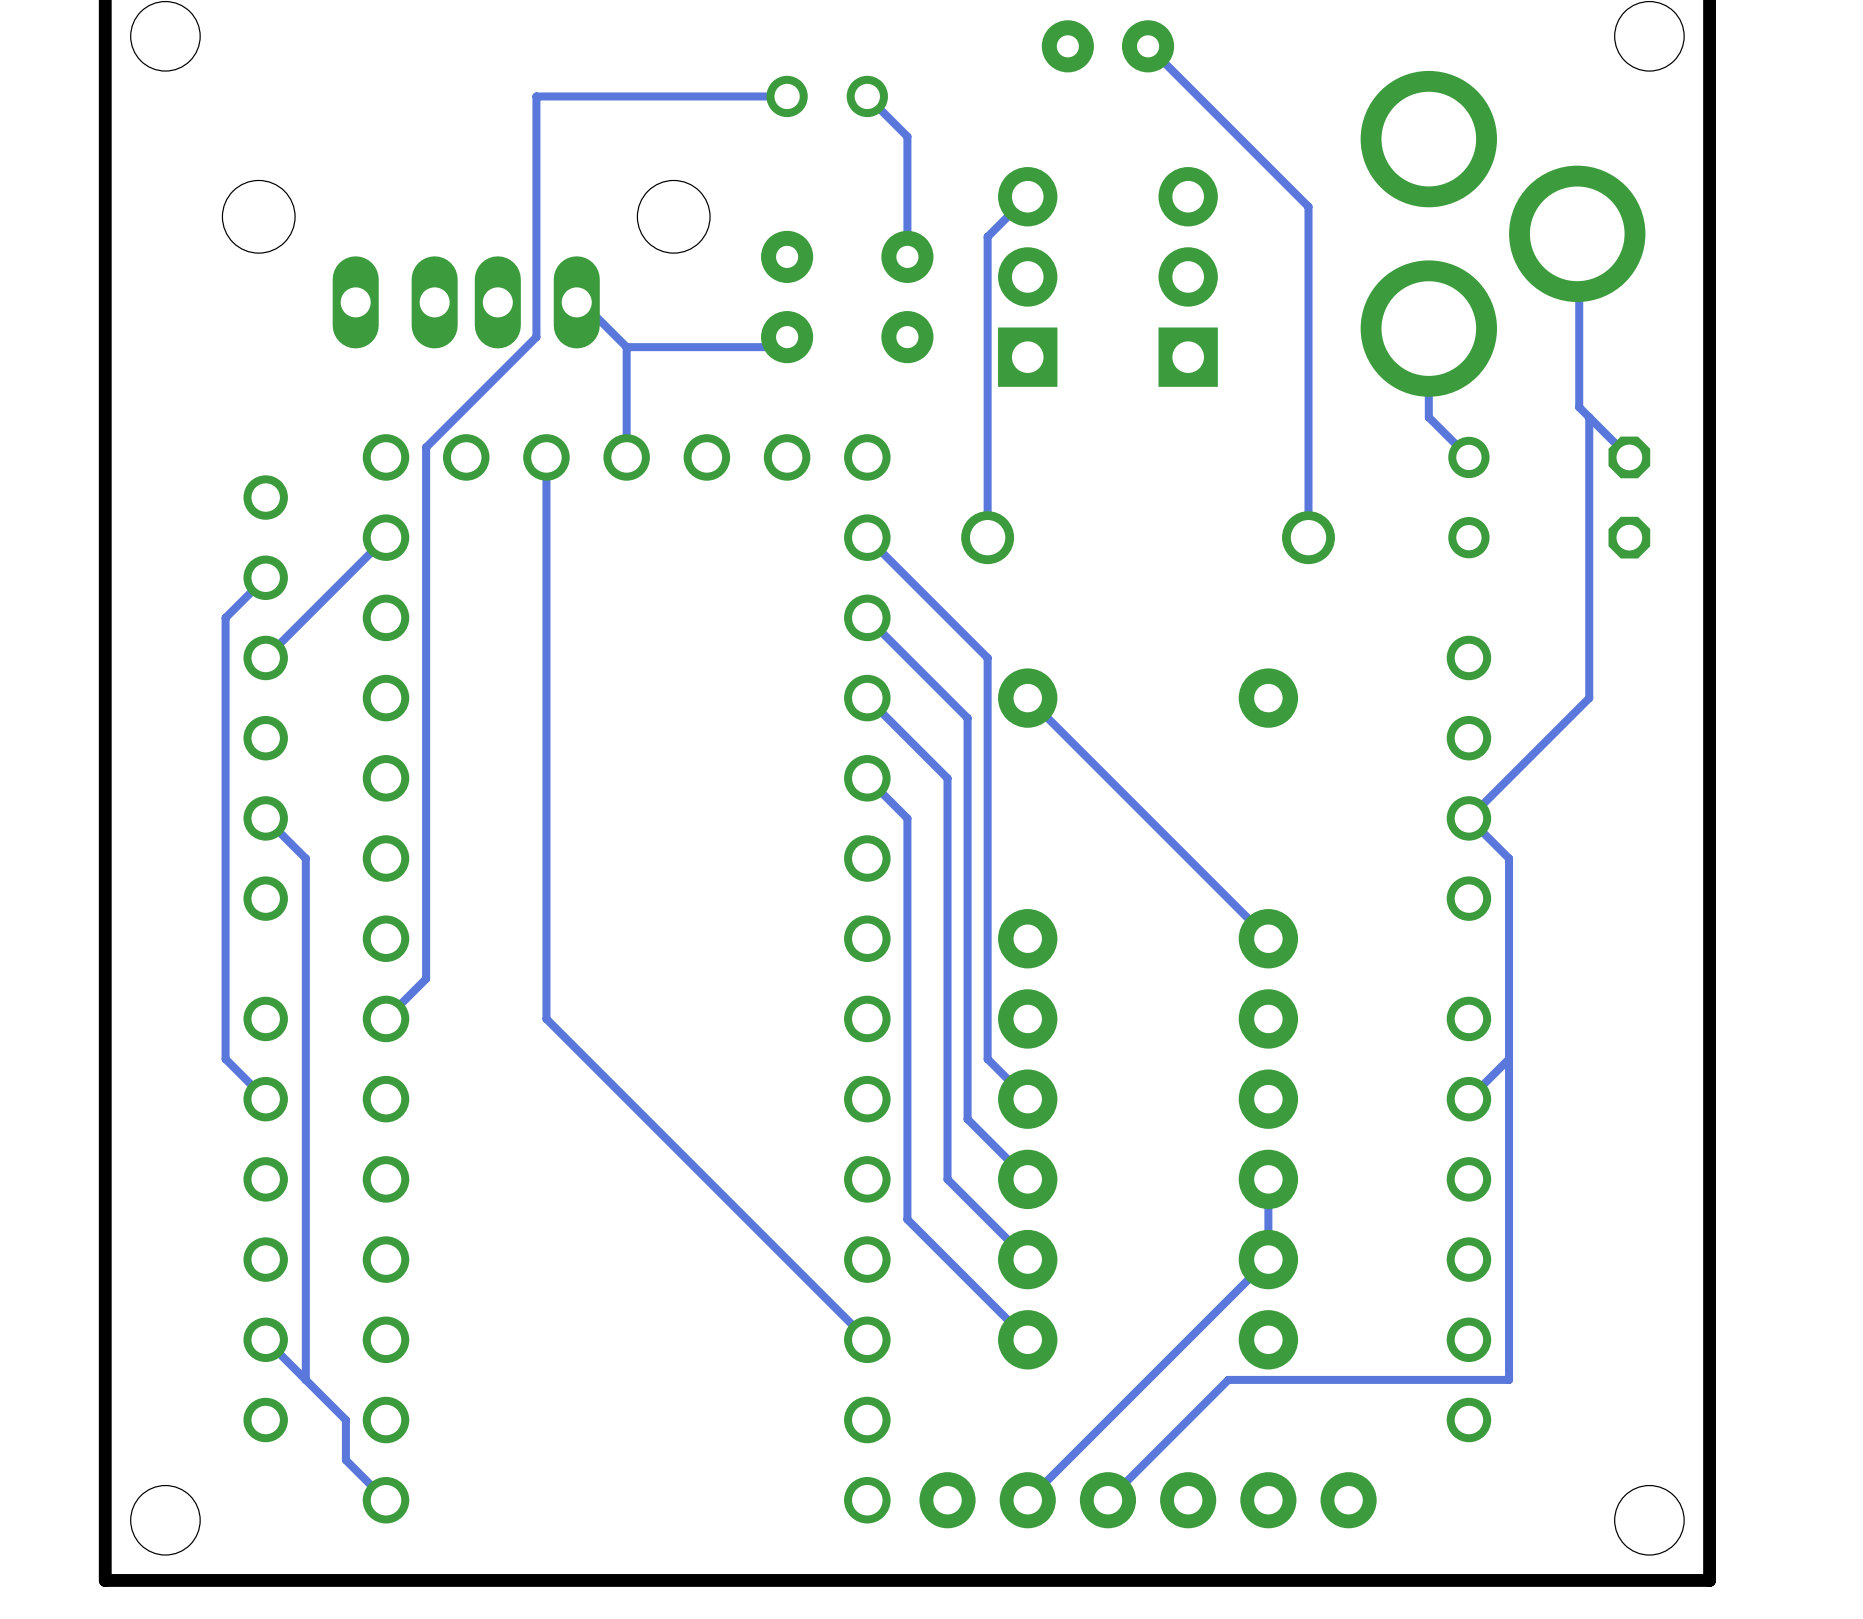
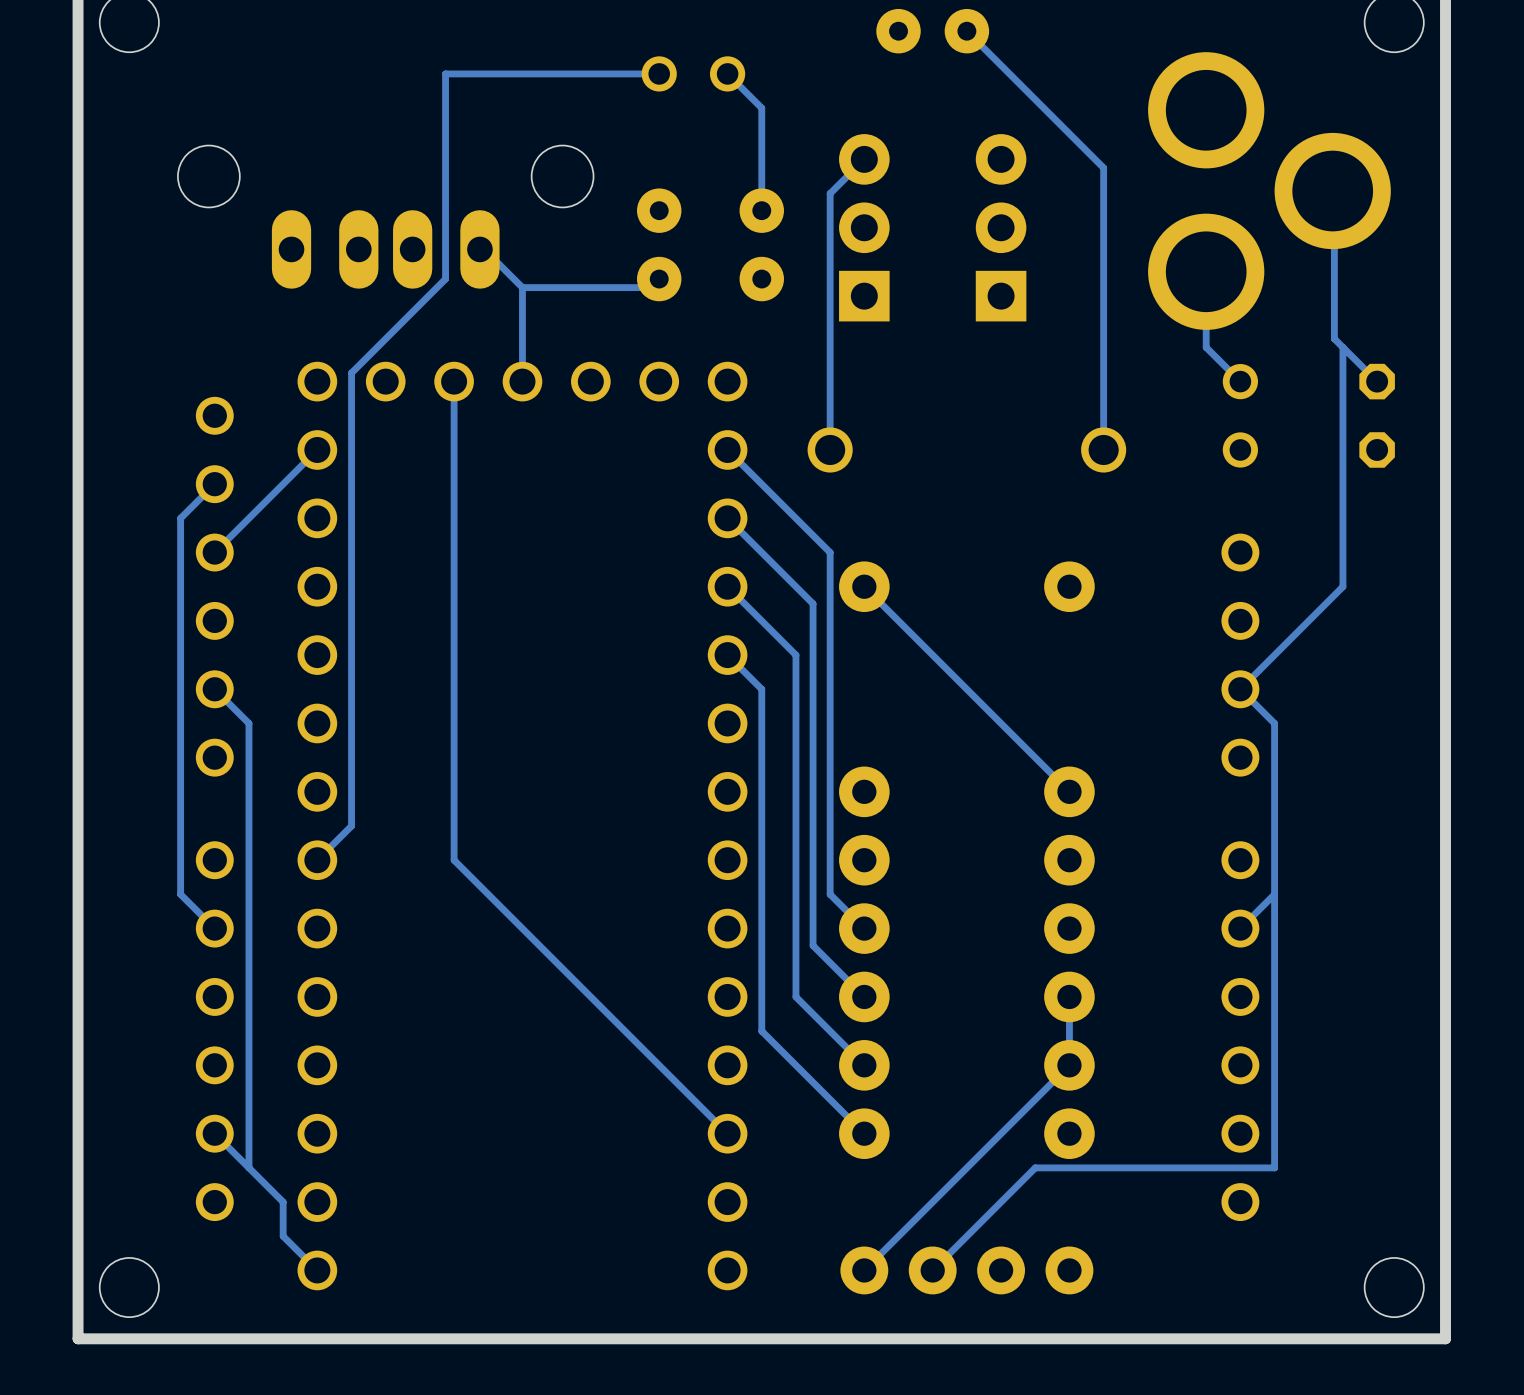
part footprint: [919, 1472, 1377, 1529] -> [840, 1246, 1094, 1295]

